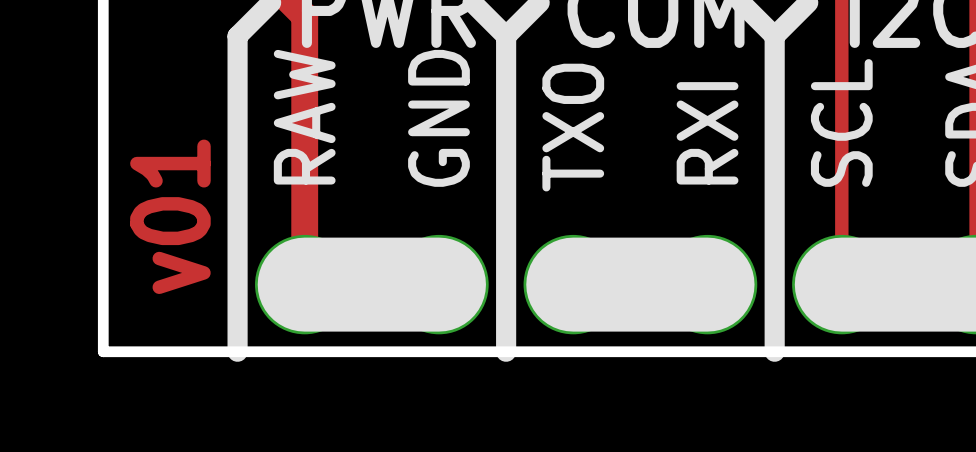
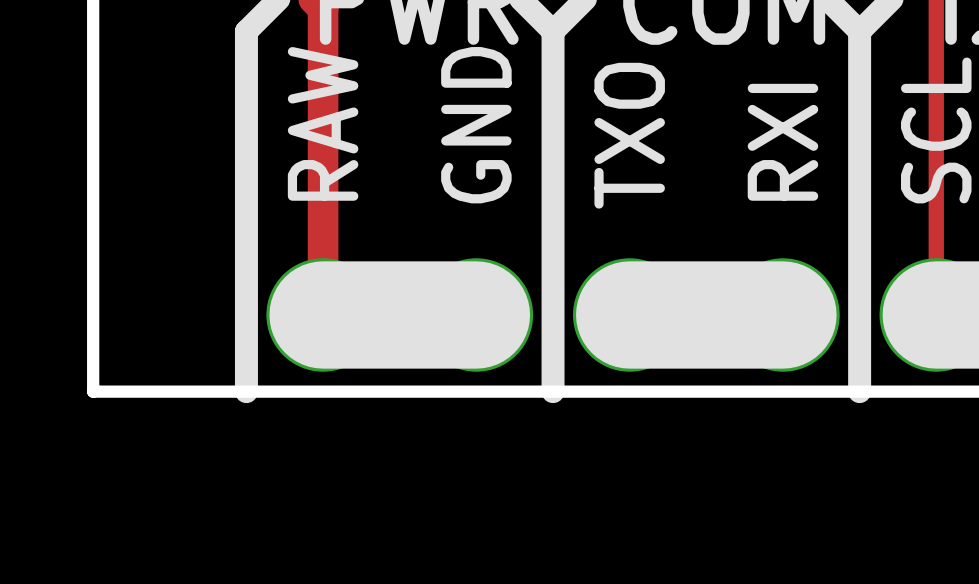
text: v01 (170, 216) -> none

